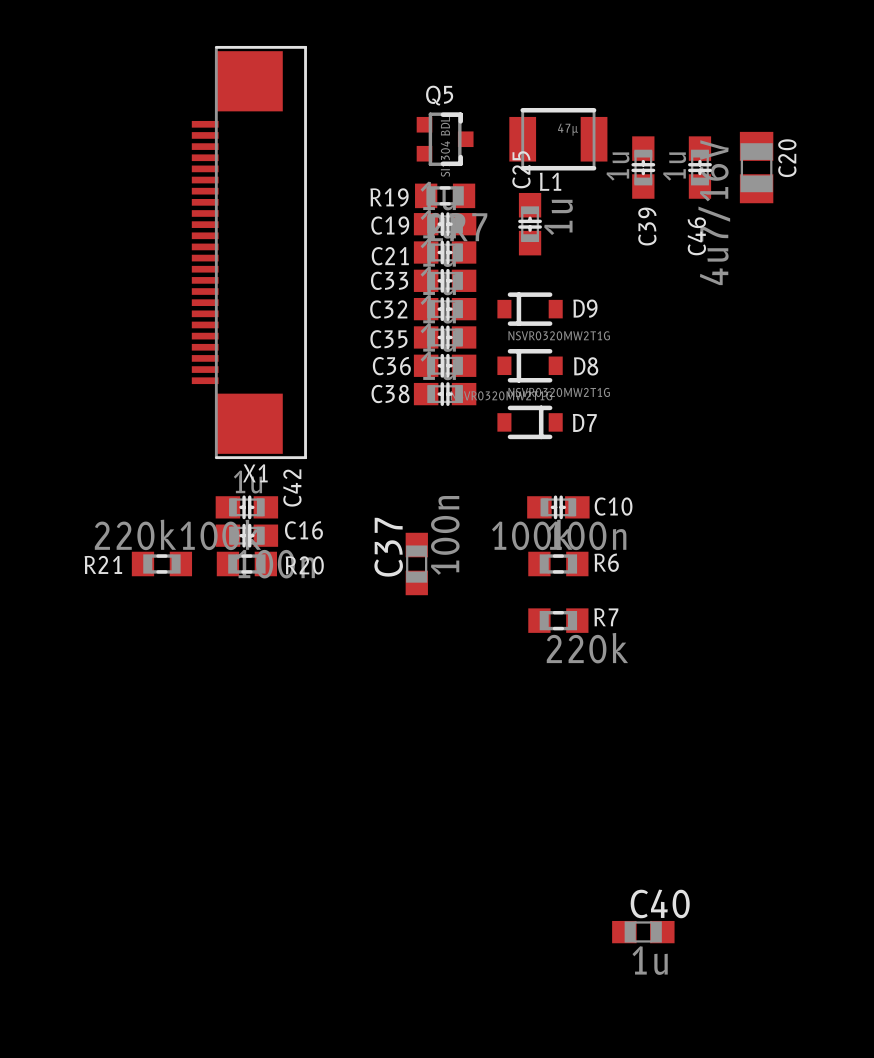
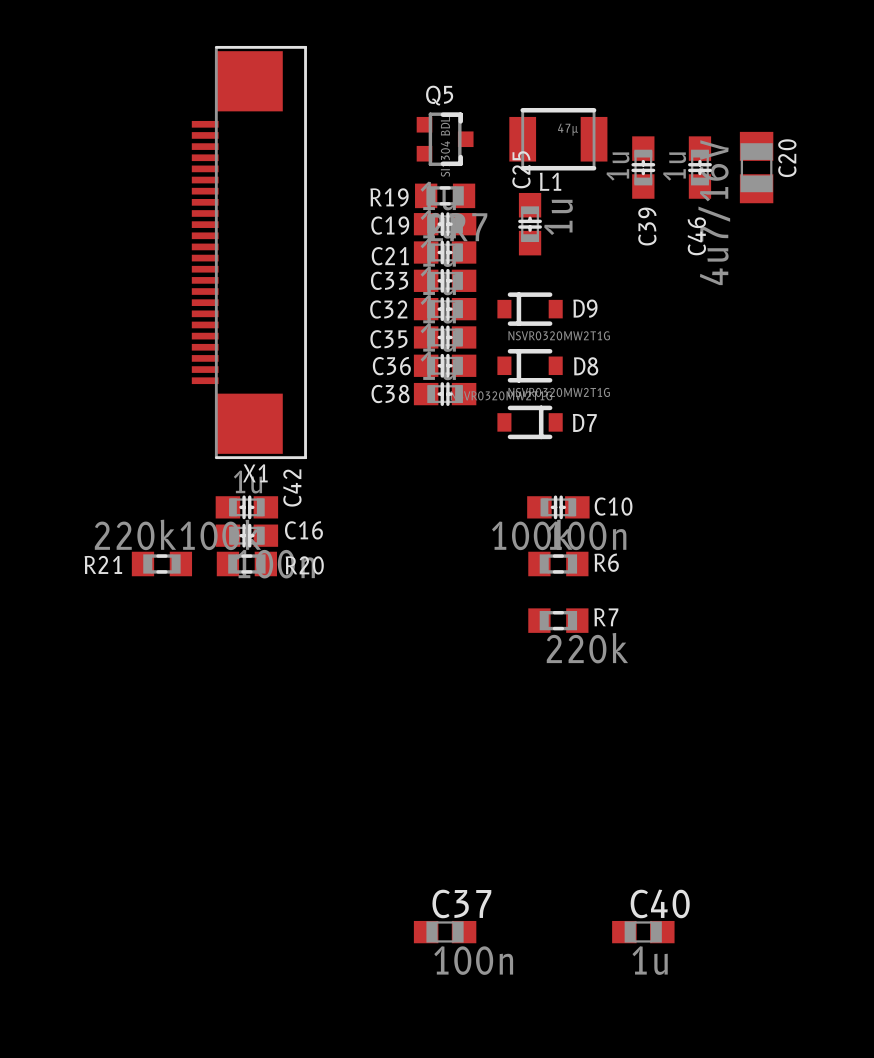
C37 rotation: 0° (416, 563) -> 90° clockwise (445, 932)
C37 position: (416, 563) -> (445, 932)

